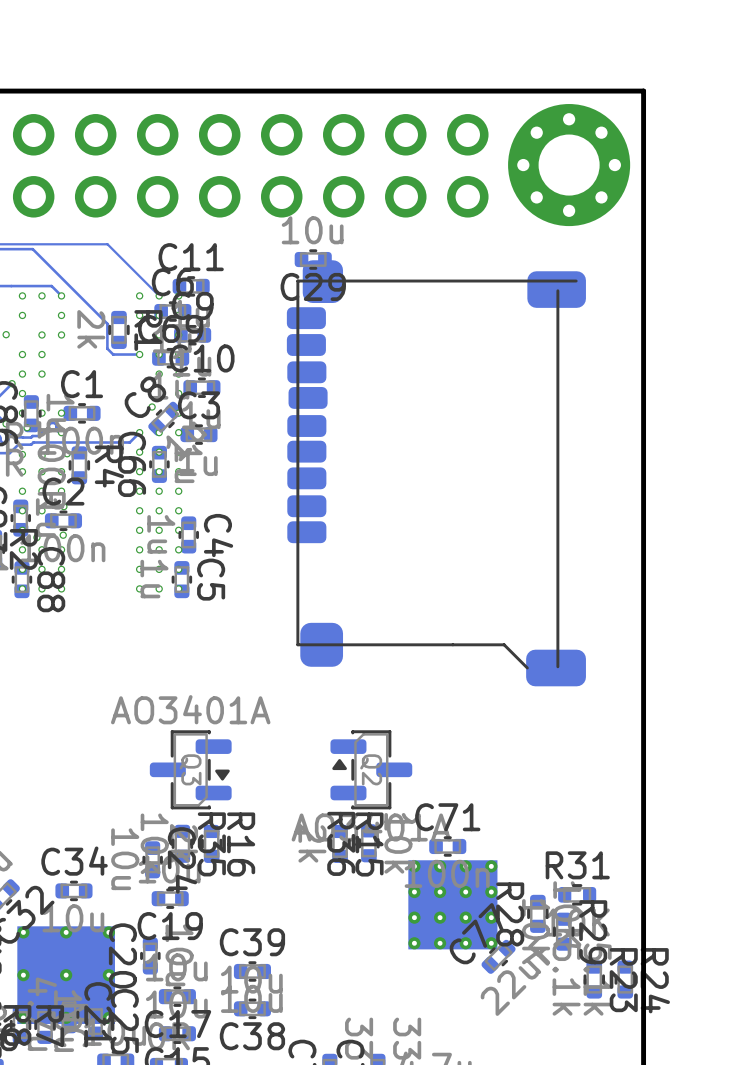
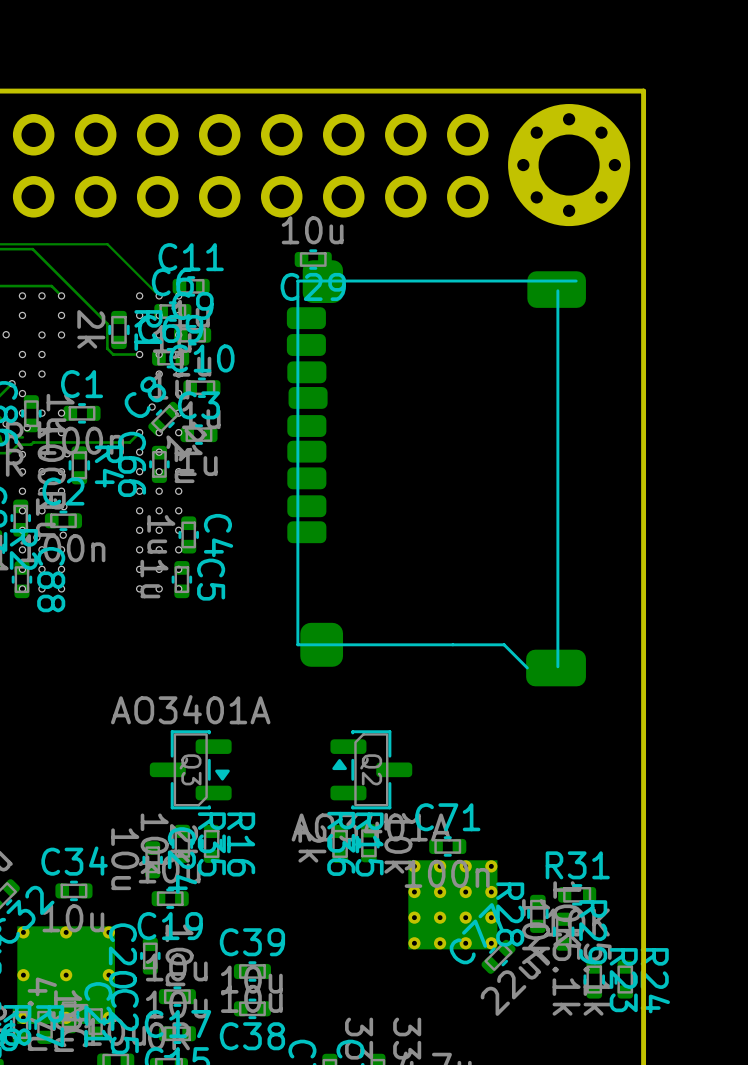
track: (61, 432) (57, 431) (56, 424) (52, 422) (49, 424) (46, 432) (41, 432) (38, 436) (23, 437) -> none

